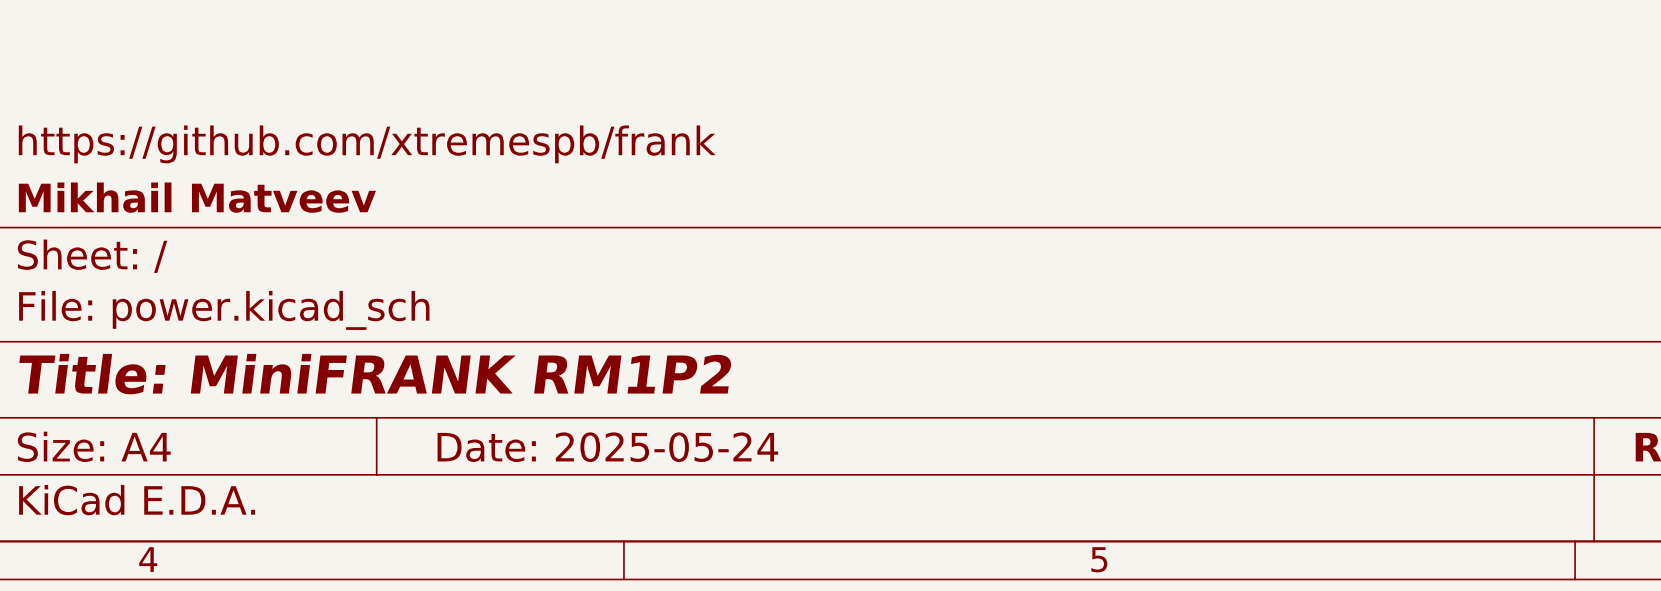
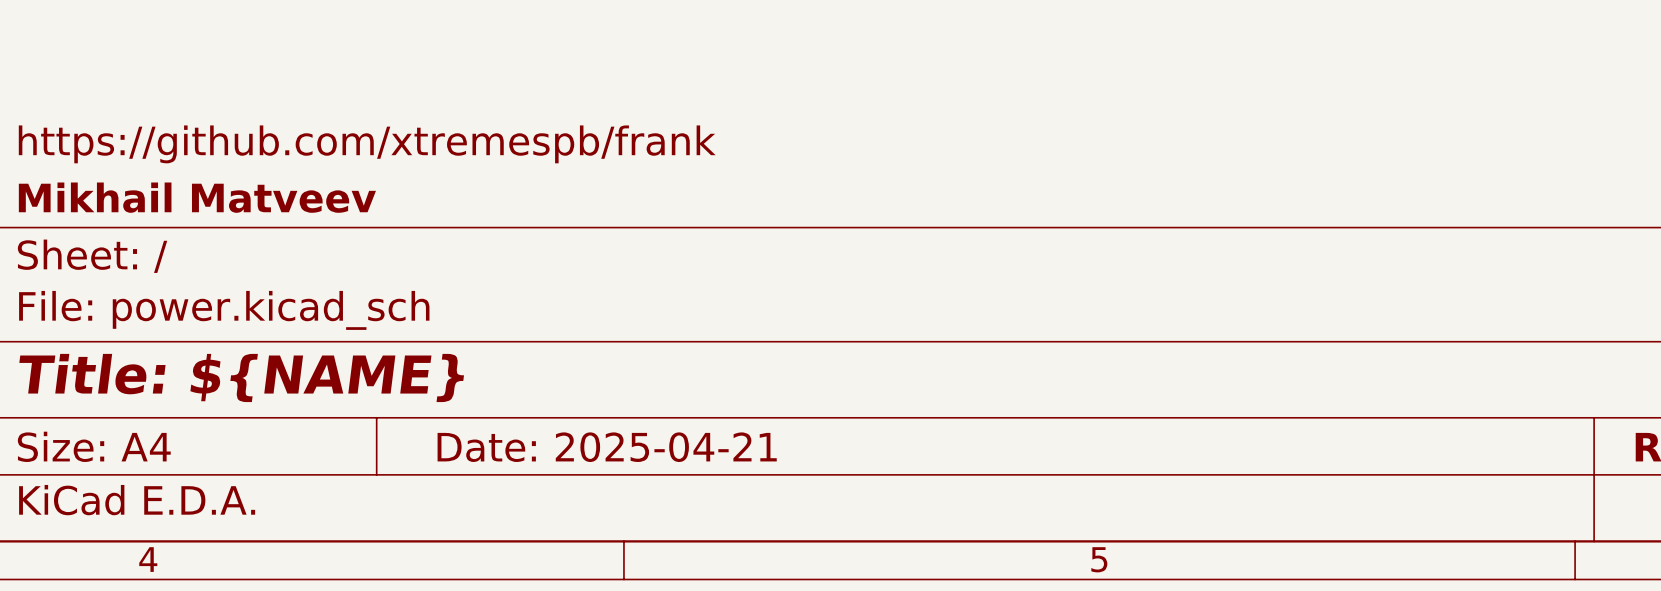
title block: Title: MiniFRANK RM1P2 (375, 374) -> Title: ${NAME} (241, 377)
title block: Date: 2025-05-24 (607, 447) -> Date: 2025-04-21 (607, 447)

